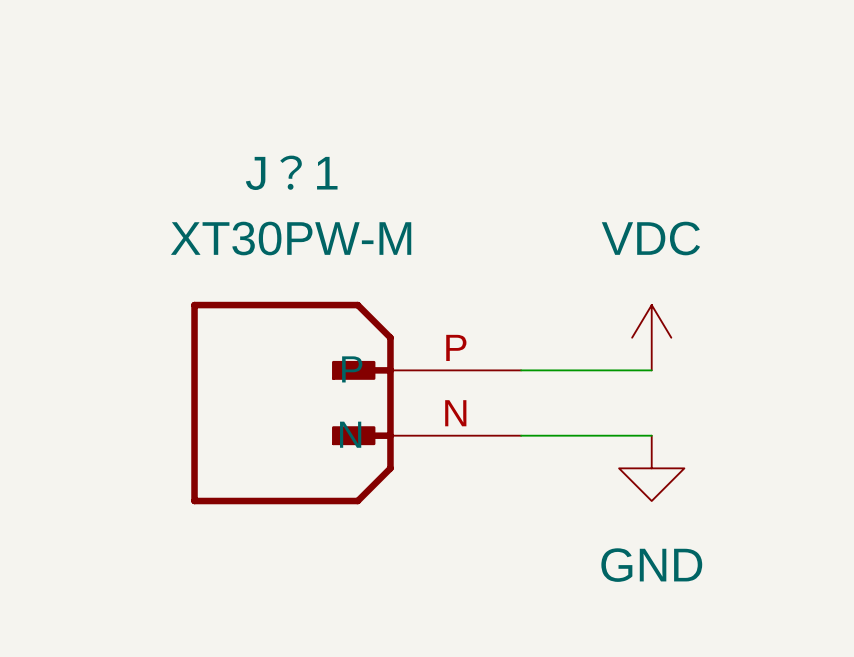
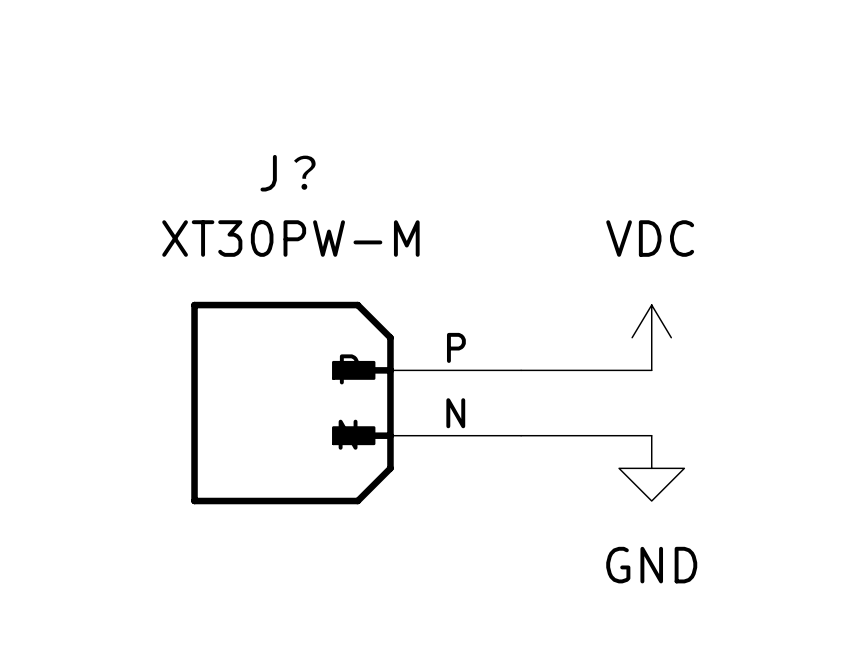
J？1 name: J？1 (291, 172) -> J？ (289, 172)

